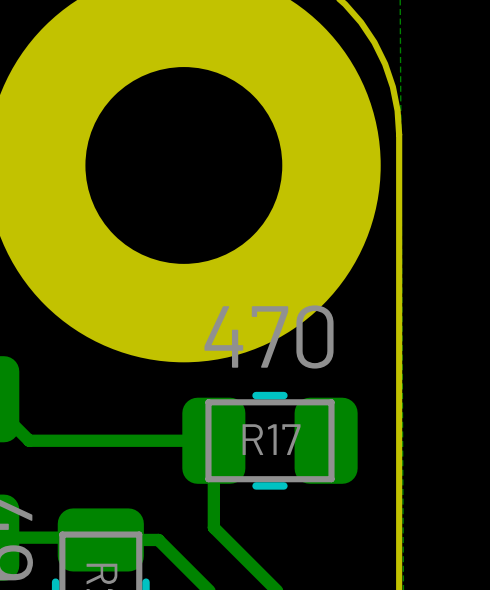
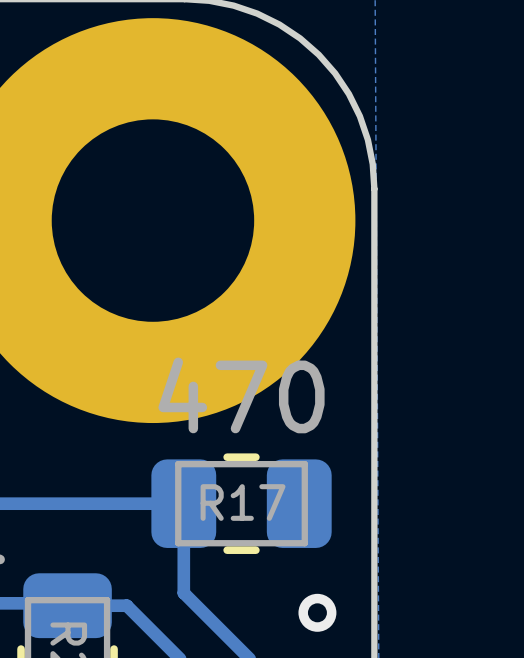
via: none -> (317, 612)

